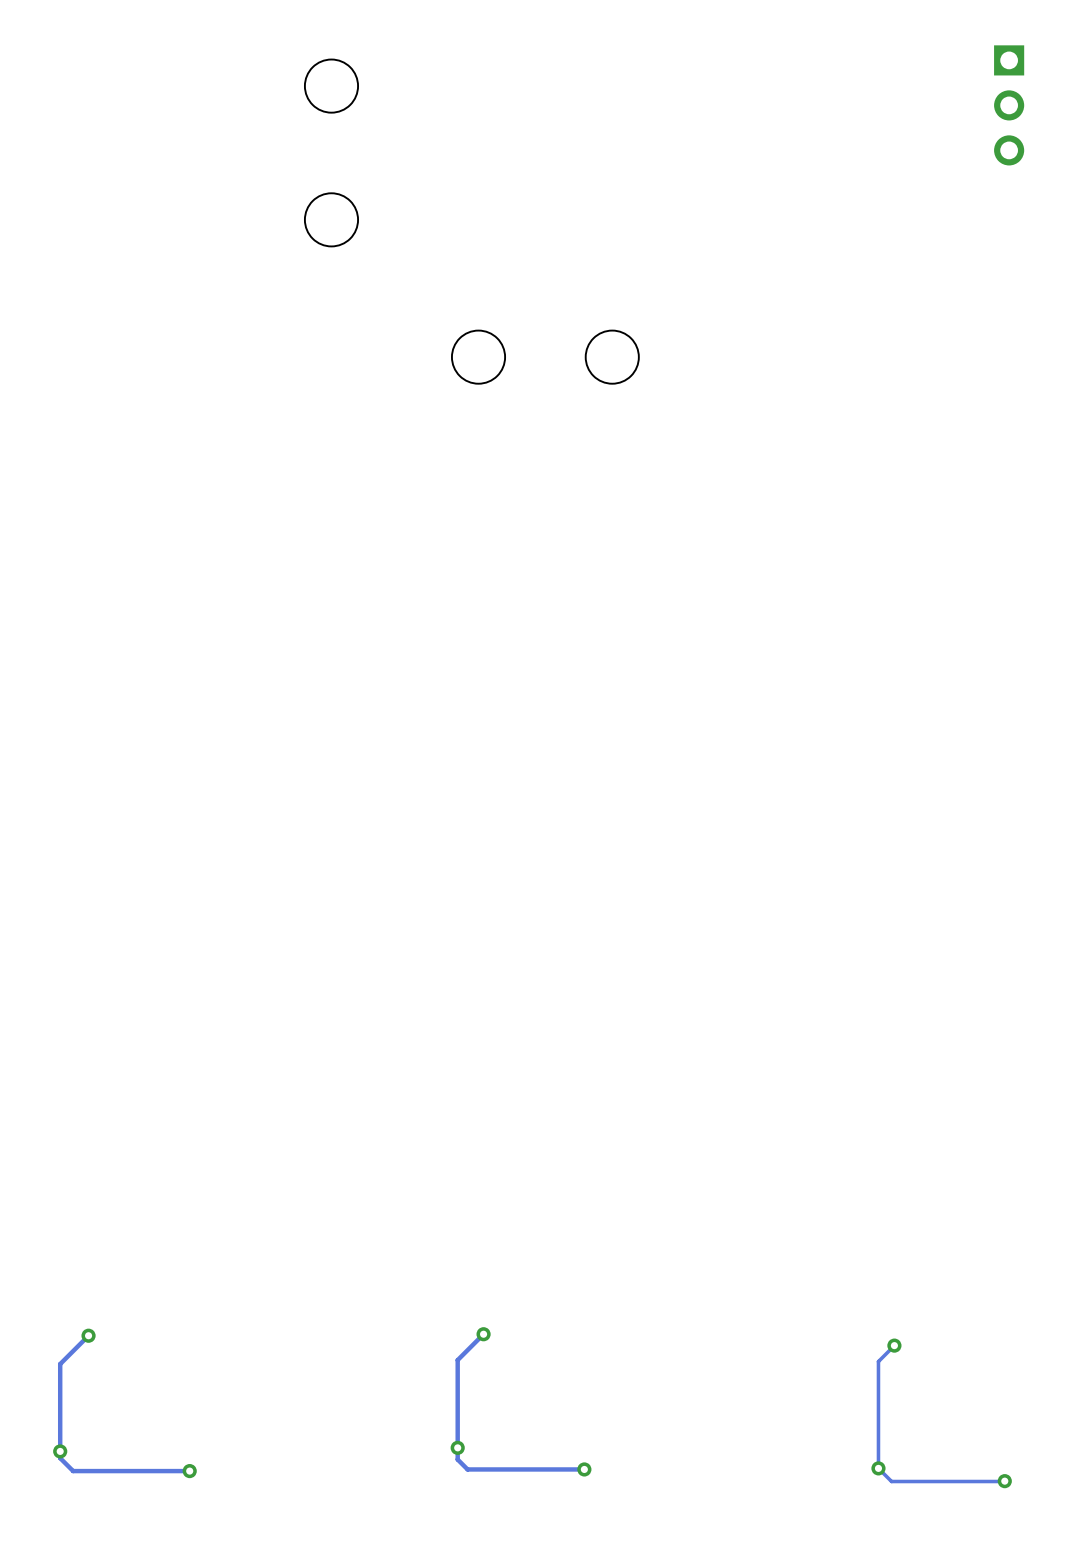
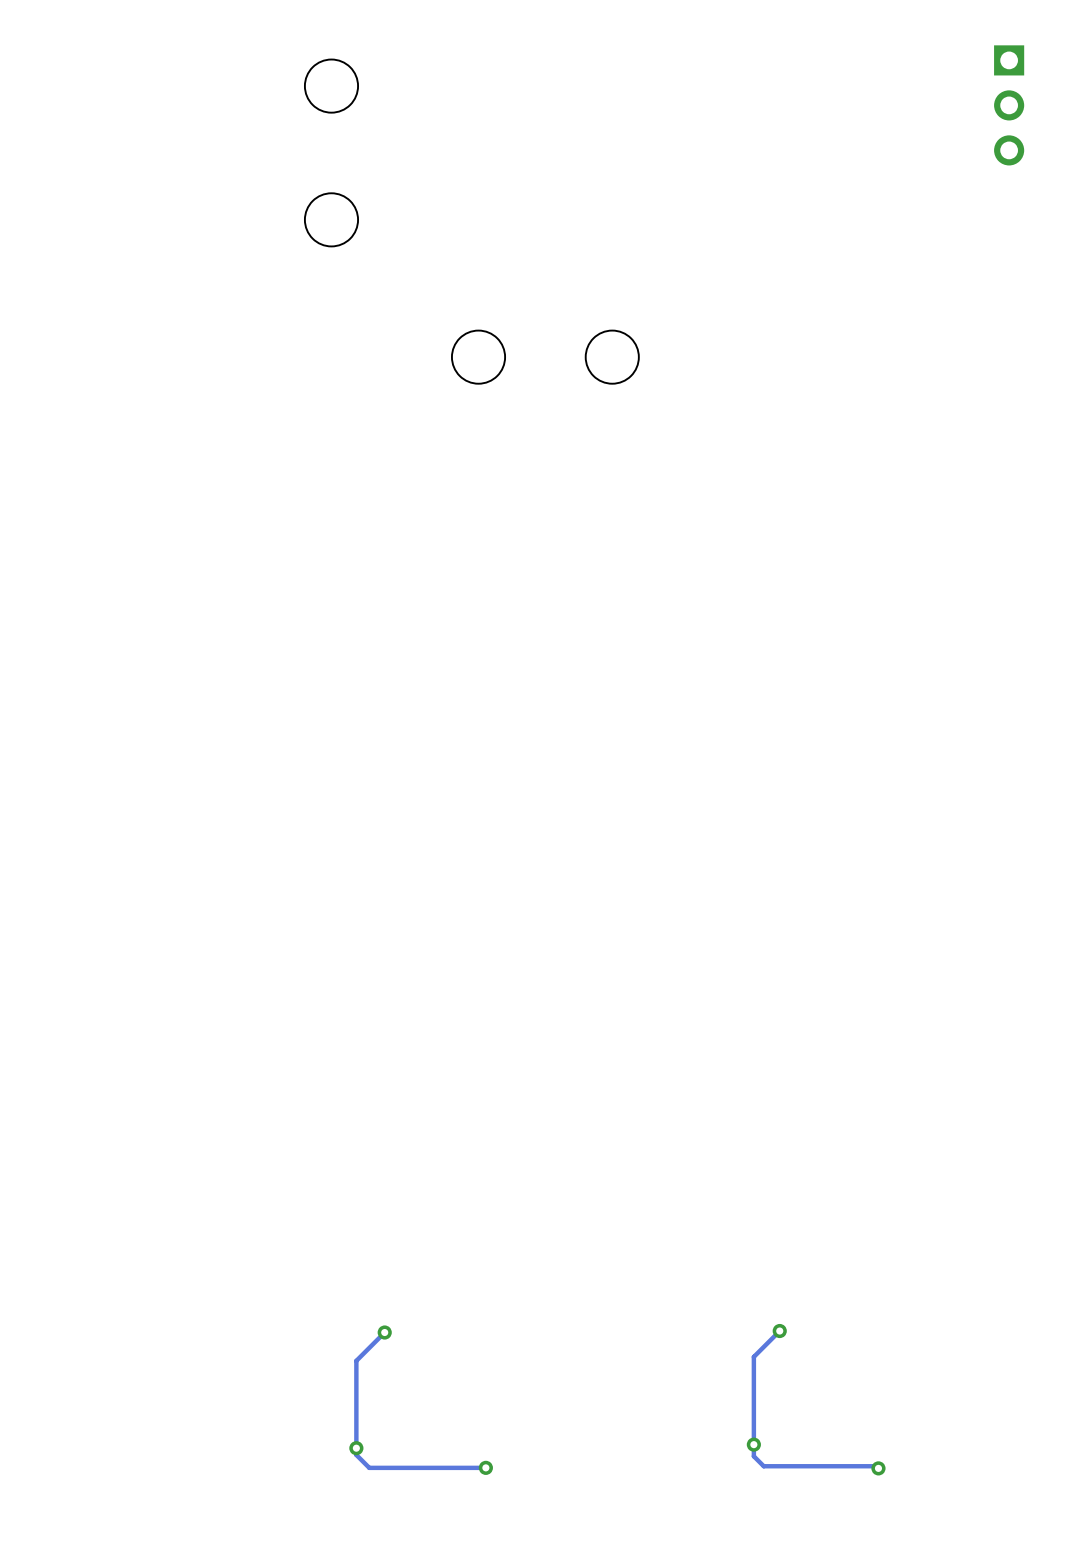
via: none -> (779, 1331)
via: none -> (384, 1332)
track: (483, 1334) (457, 1360) (457, 1459) (467, 1469) (584, 1469) -> (779, 1331) (753, 1356) (753, 1456) (763, 1466) (880, 1466)
via: (483, 1334) -> none
track: (88, 1335) (60, 1364) (60, 1458) (73, 1471) (189, 1471) -> (384, 1332) (356, 1360) (356, 1454) (369, 1467) (485, 1467)
via: (88, 1335) -> none
track: (894, 1345) (878, 1361) (878, 1468) (891, 1481) (1004, 1481) -> none
via: (894, 1345) -> none
via: none -> (753, 1444)
via position: (457, 1447) -> (485, 1467)
via: none -> (356, 1448)
via: (60, 1451) -> none
via: (584, 1469) -> none
via: (189, 1471) -> none
via: (1004, 1481) -> none

